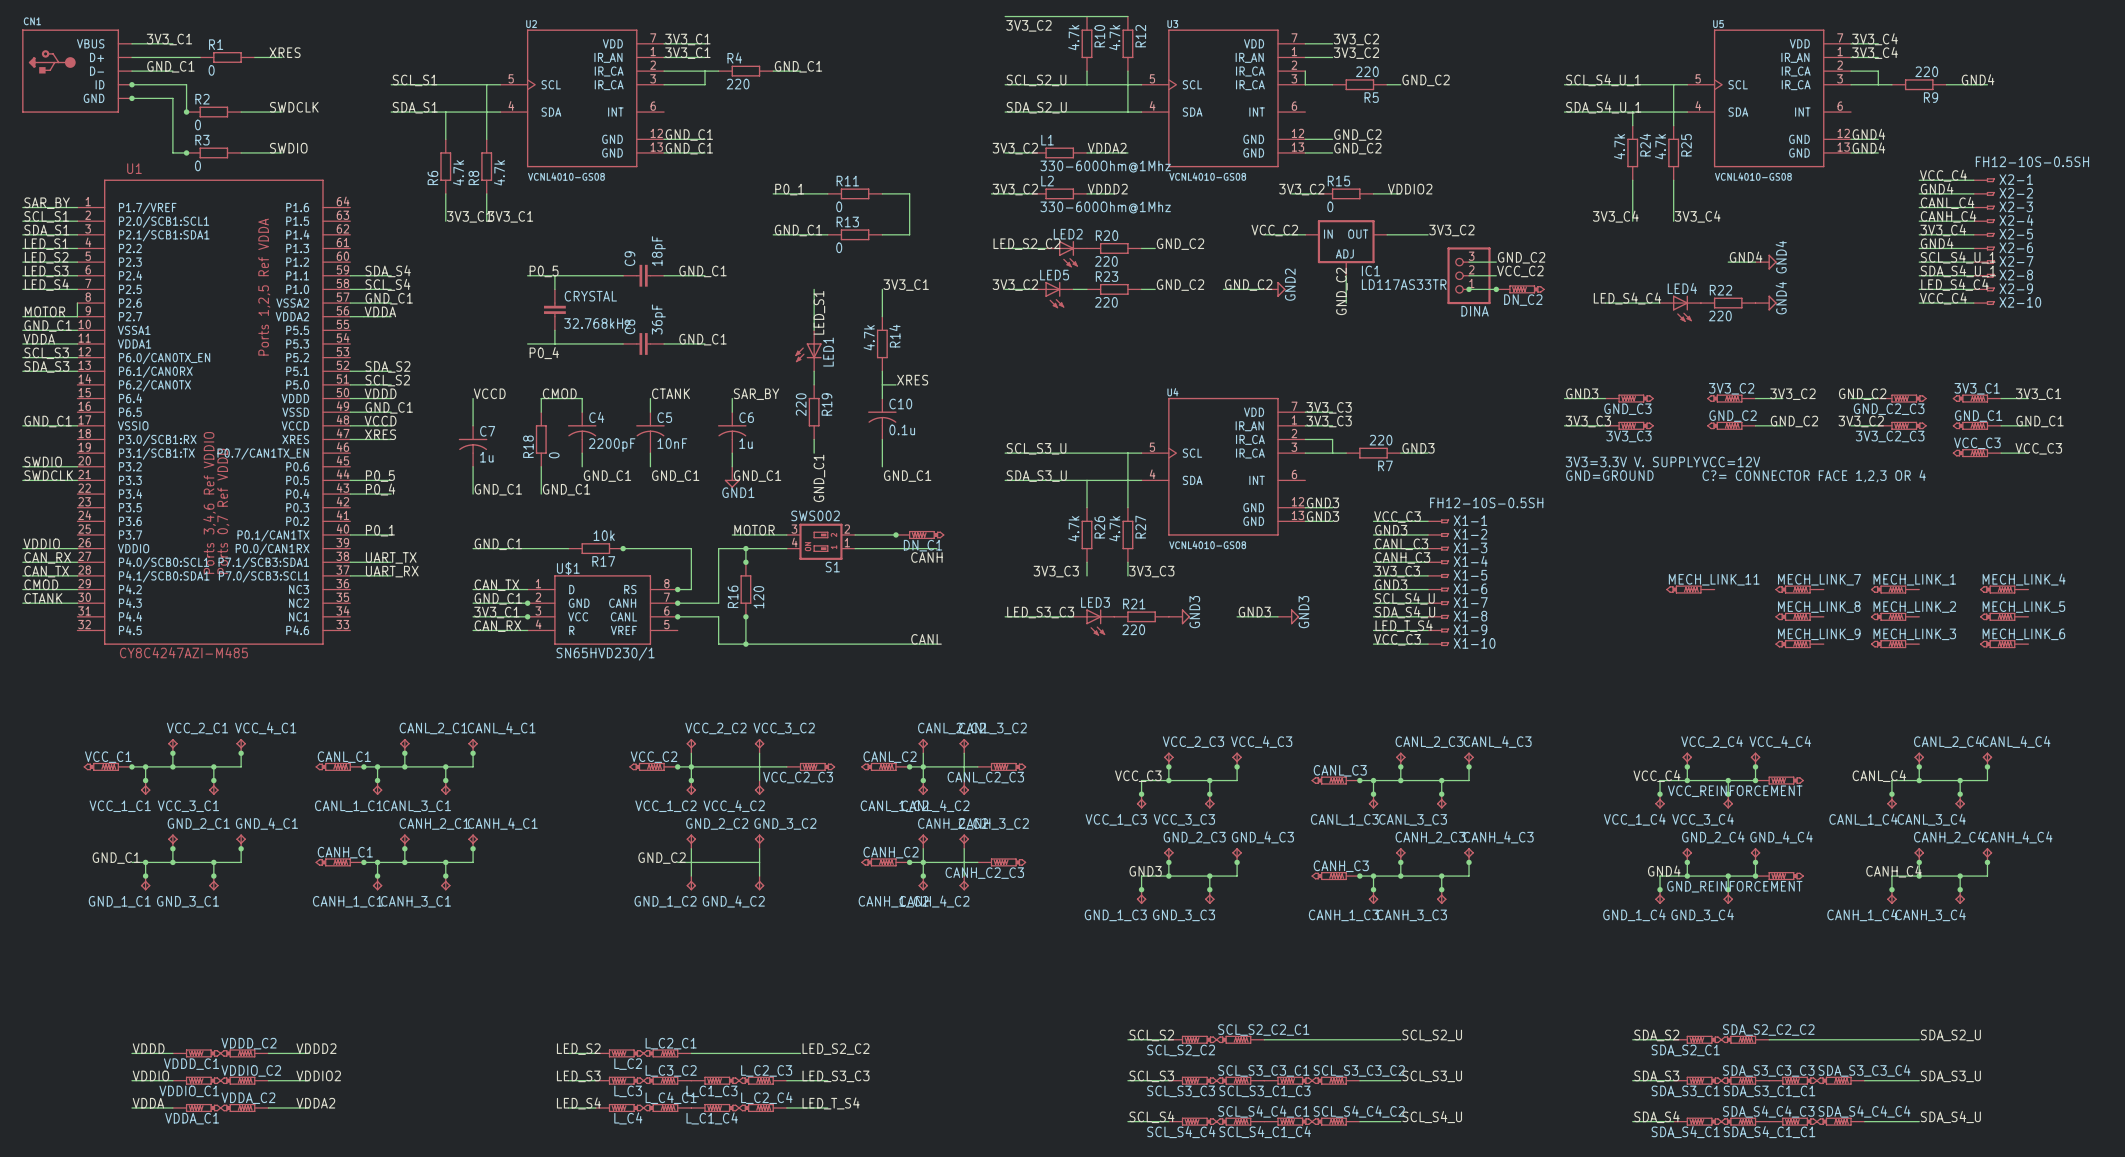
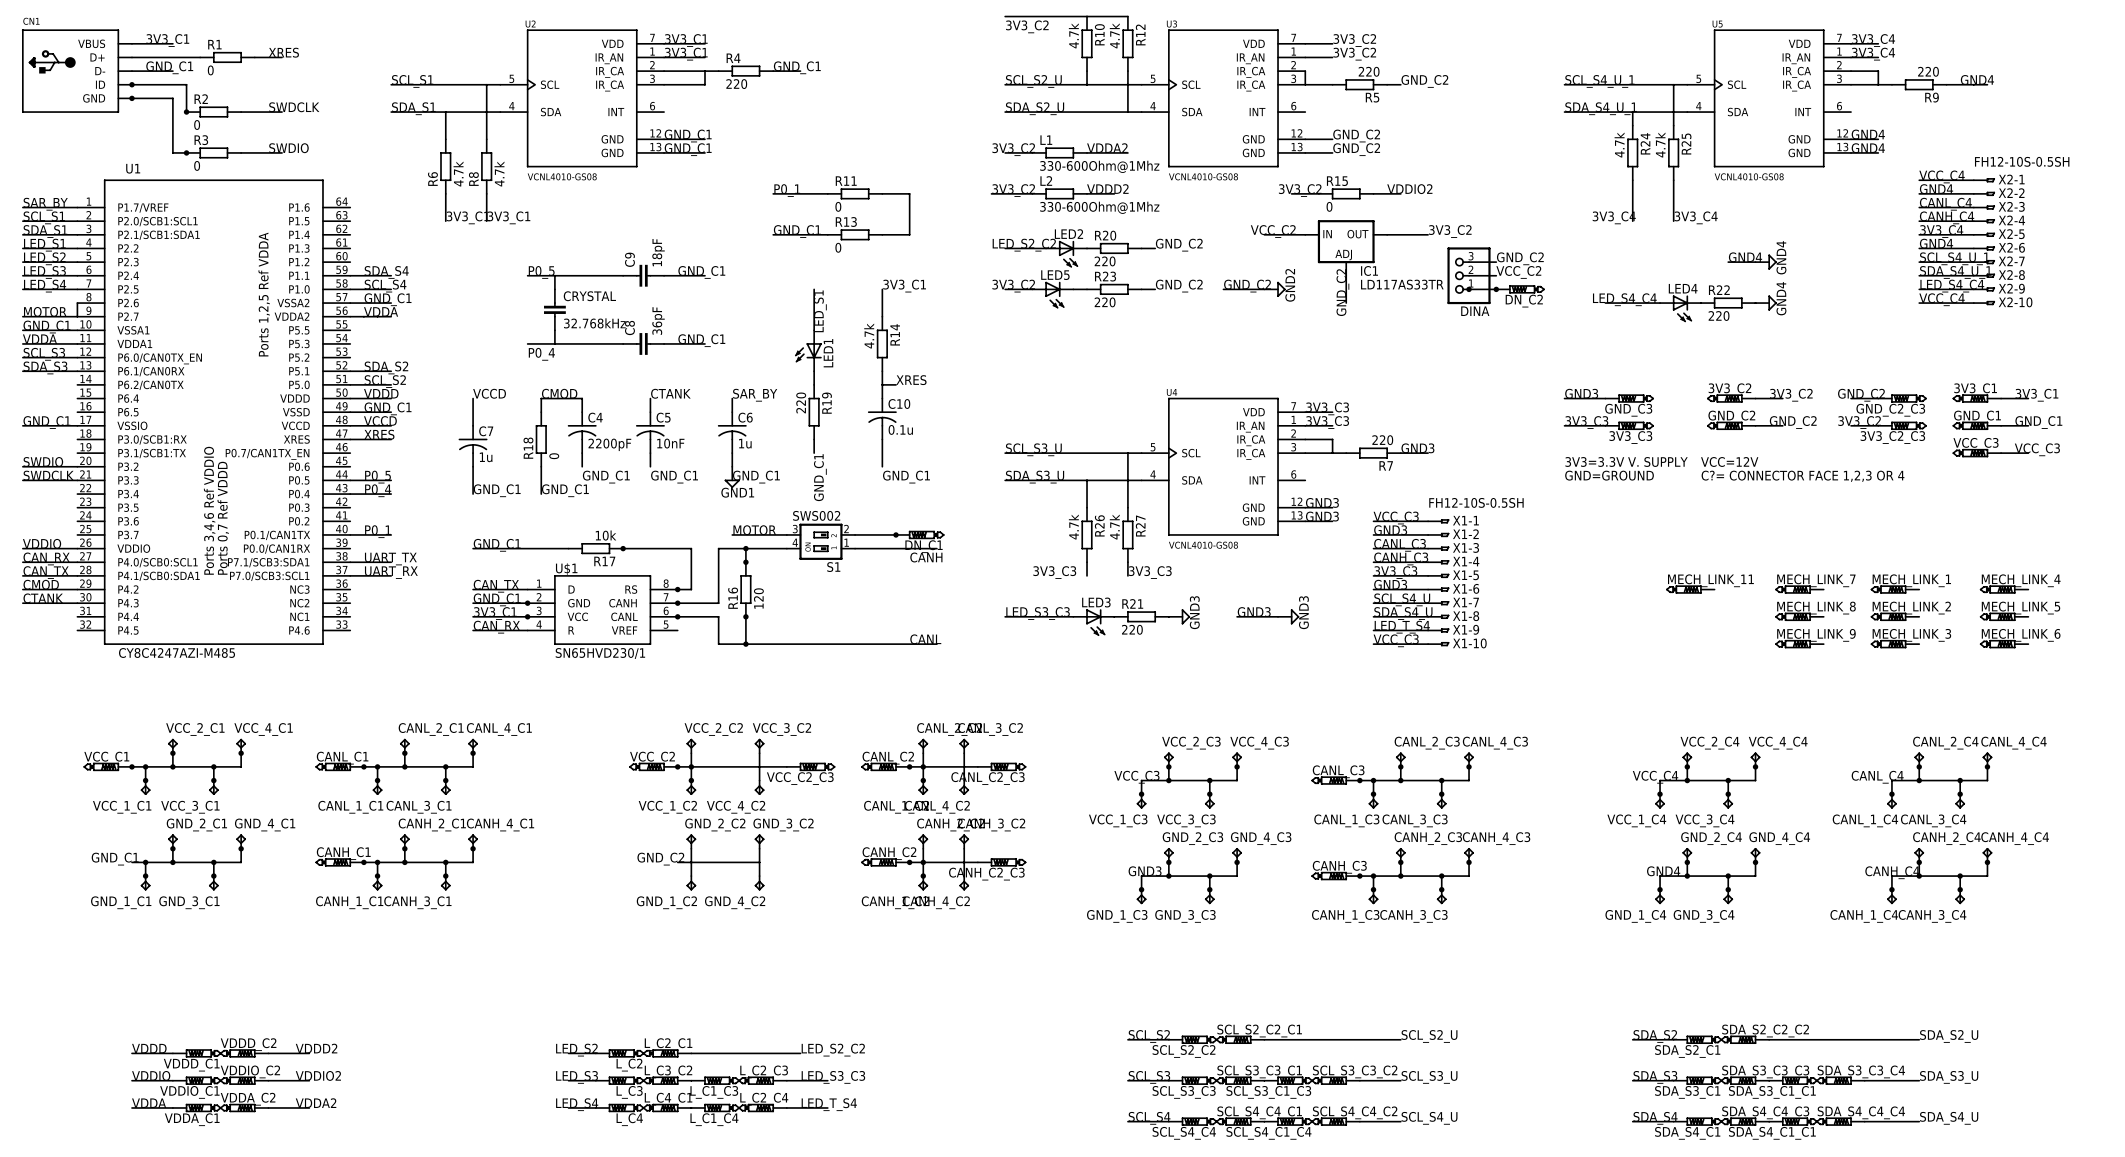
junction: (1755, 780) -> none
VCC_REINFORCEMENT: (1779, 780) -> none
junction: (1755, 876) -> none
GND_REINFORCEMENT: (1779, 876) -> none

